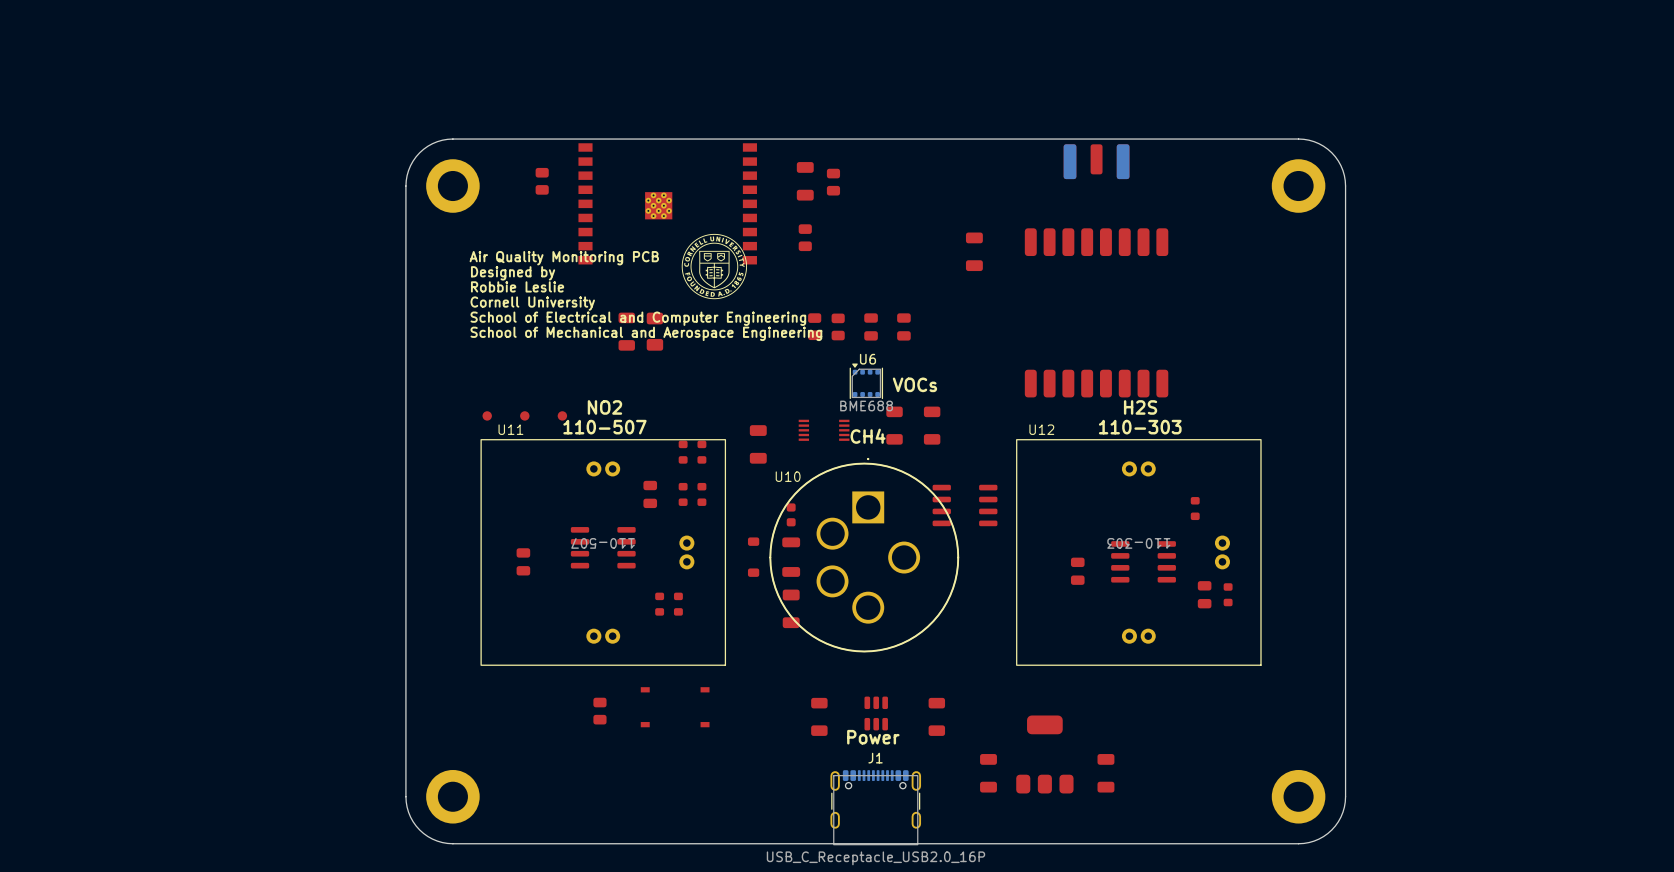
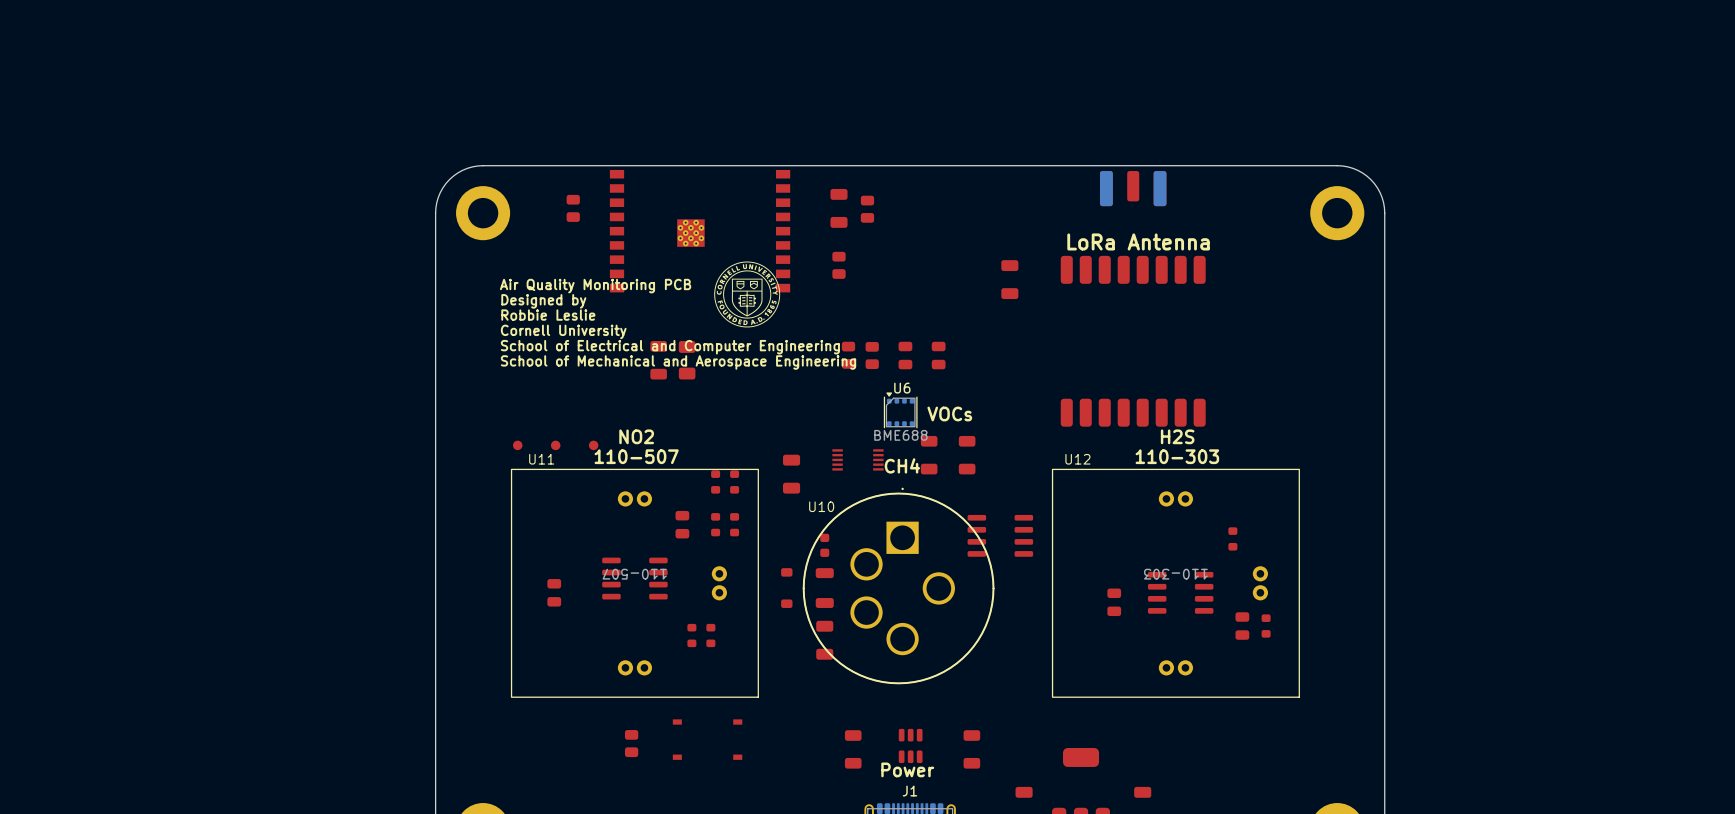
text: none -> LoRa Antenna (1138, 241)

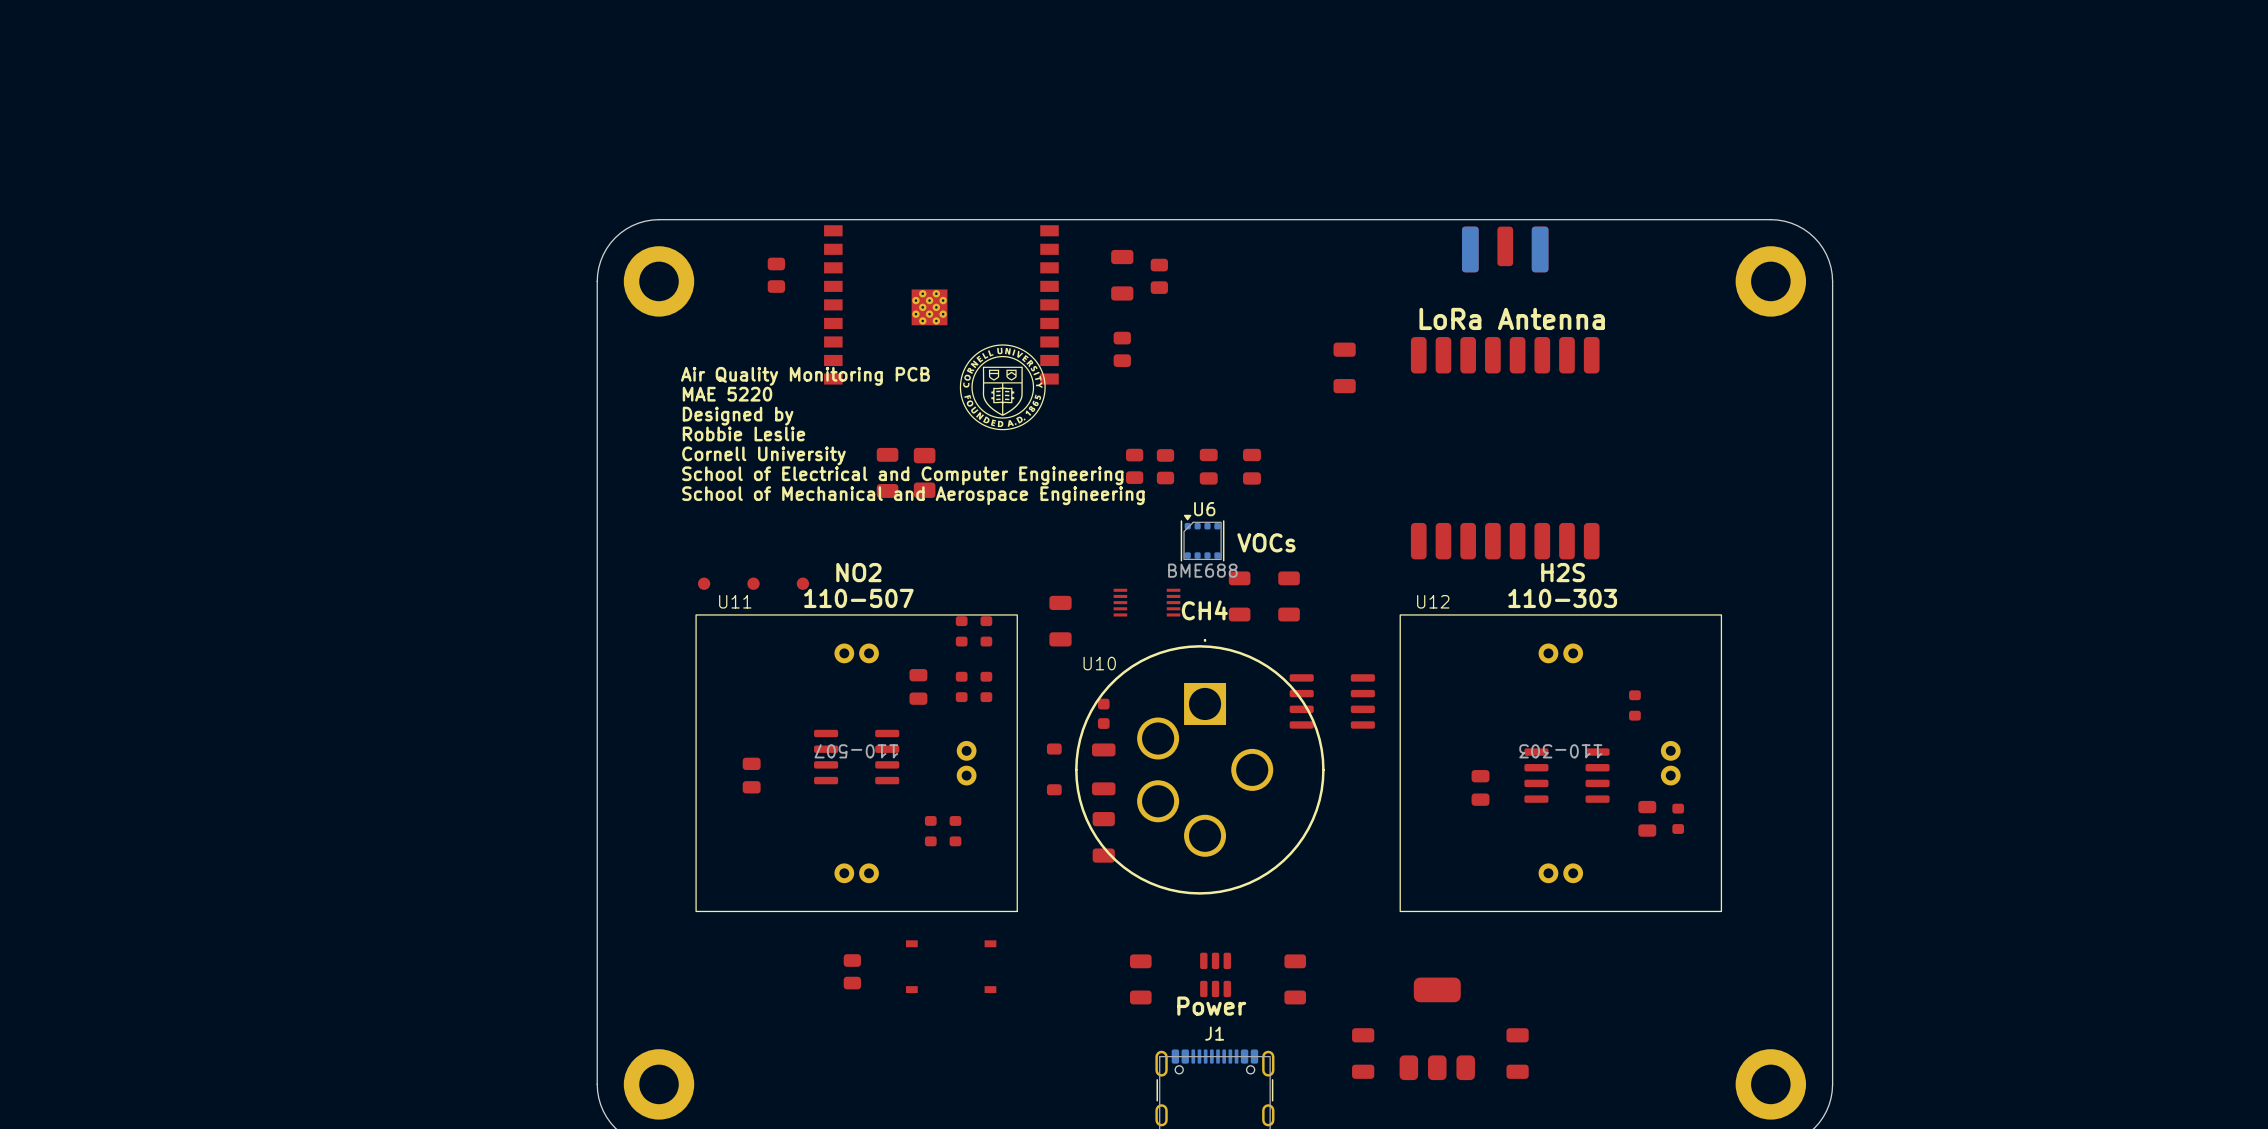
text: Designed by (543, 301) -> MAE 5220 (727, 394)
text: Robbie Leslie (548, 315) -> Designed by (738, 416)
text: Cornell University (563, 331) -> Robbie Leslie (743, 433)
text: School of Electrical and Computer Engineering (670, 347) -> Cornell University (763, 455)
text: School of Mechanical and Aerospace Engineering (678, 362) -> School of Electrical and Computer Engineering (902, 475)
text: none -> School of Mechanical and Aerospace Engineering (913, 495)

